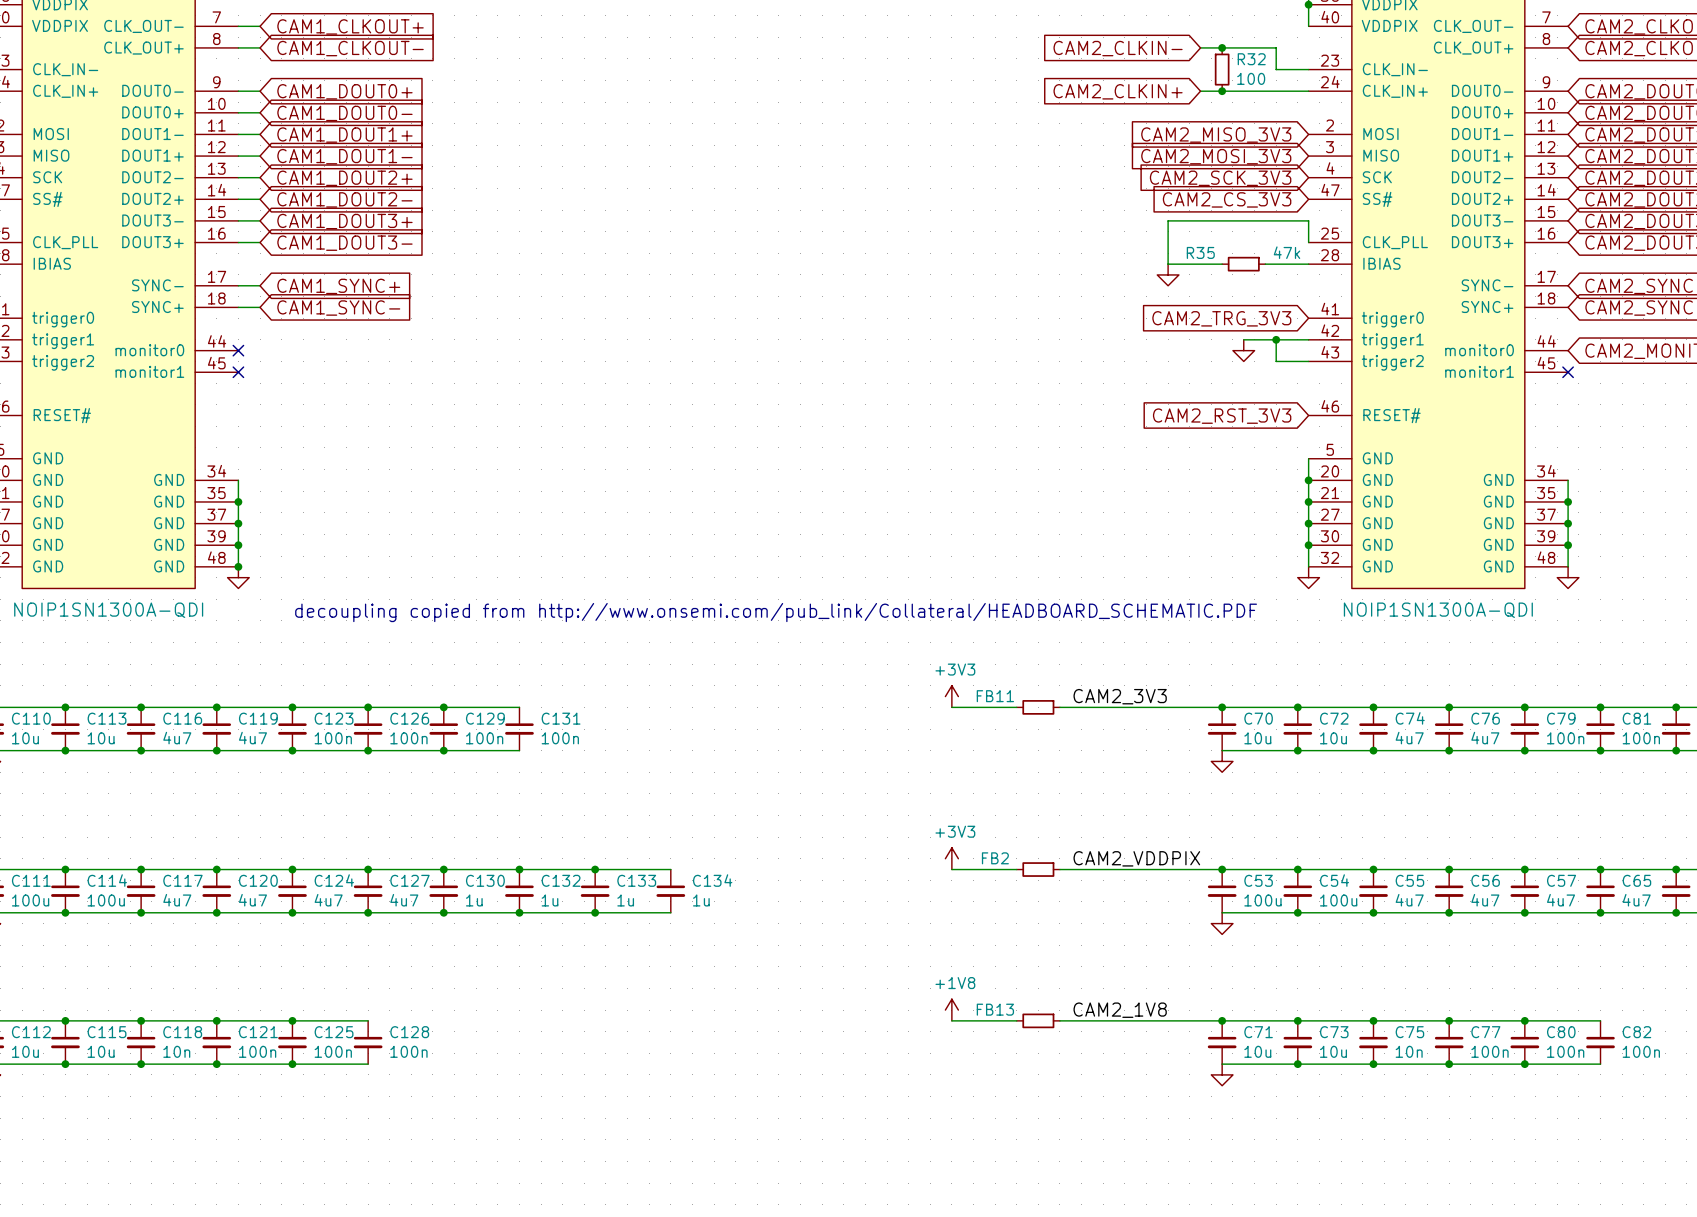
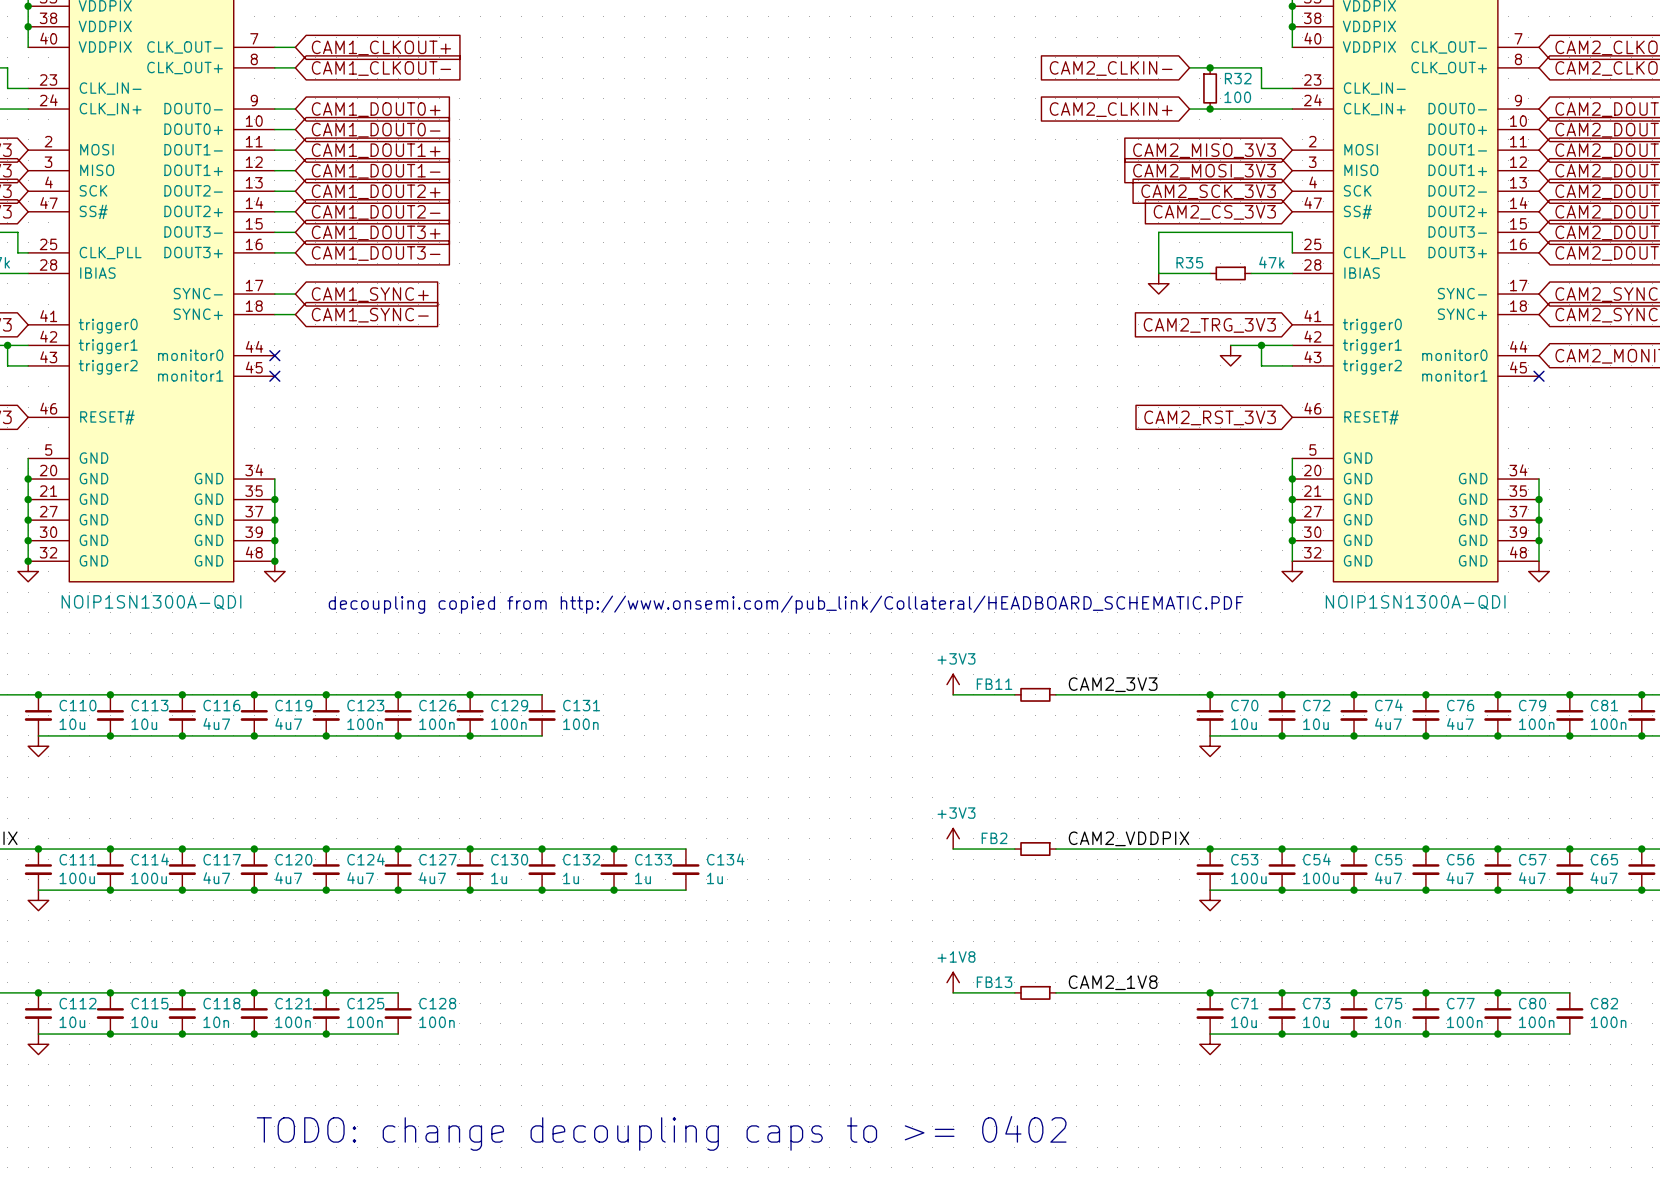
text: none -> TODO: change decoupling caps to >= 0402 (661, 1133)

